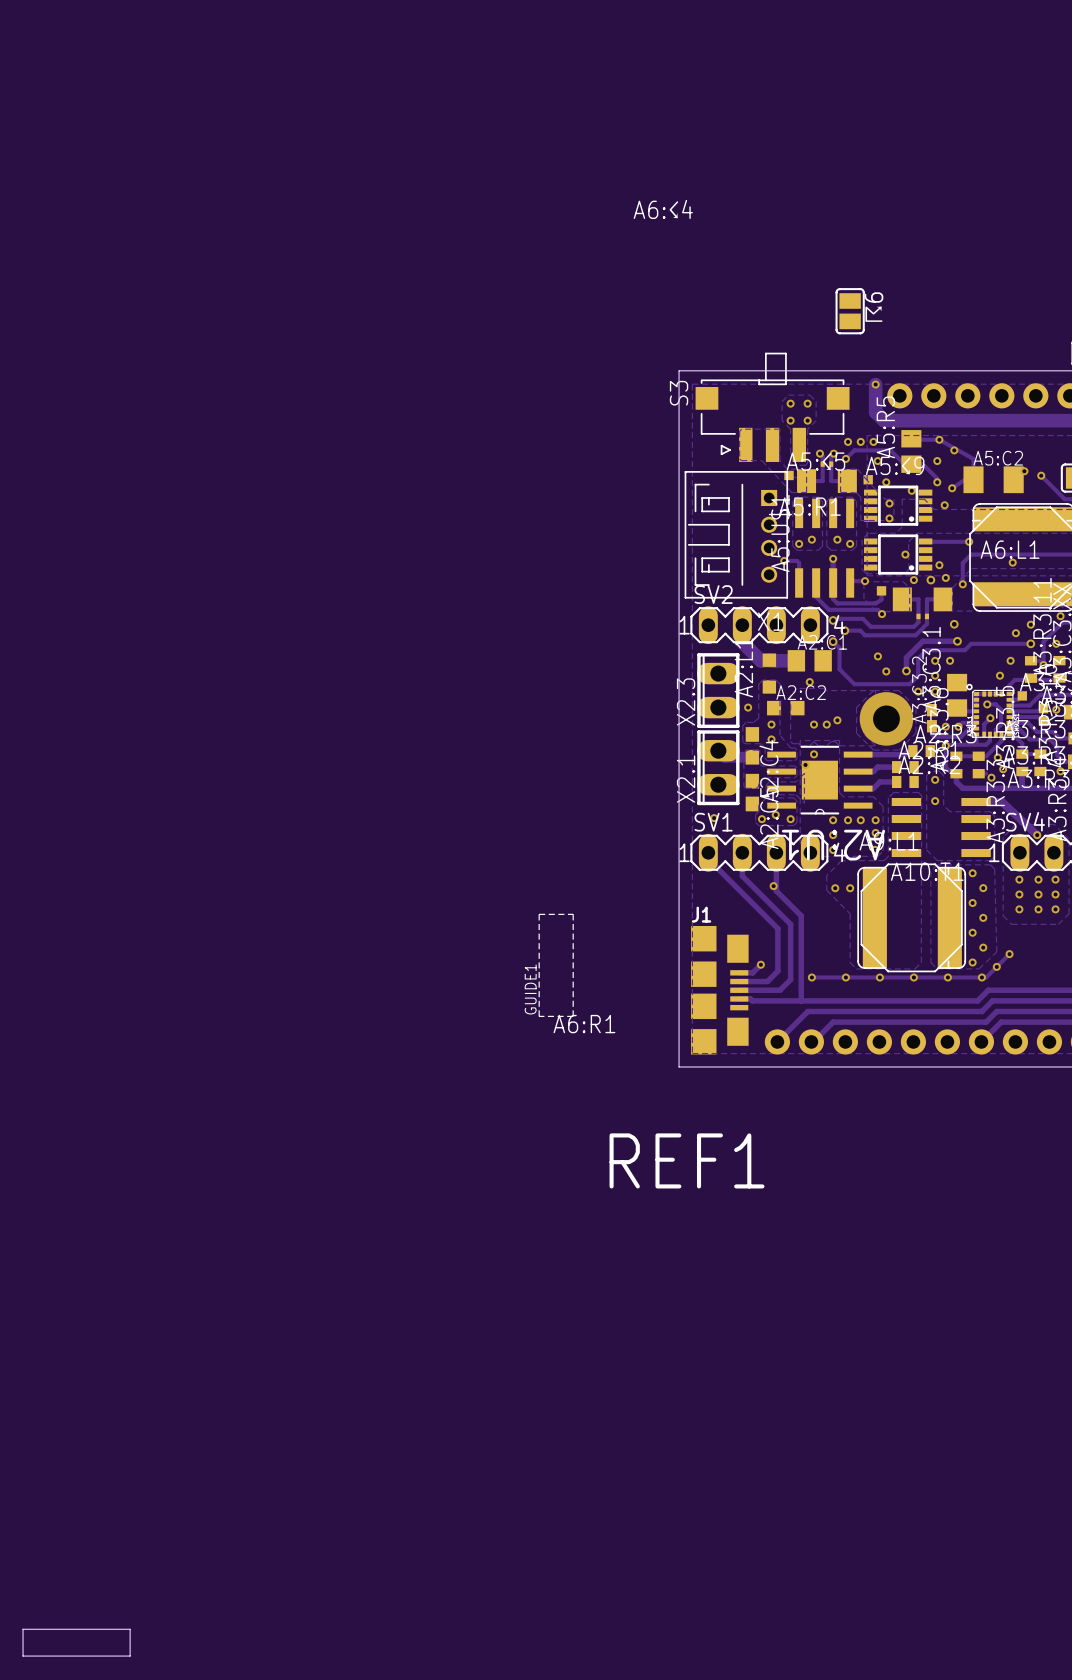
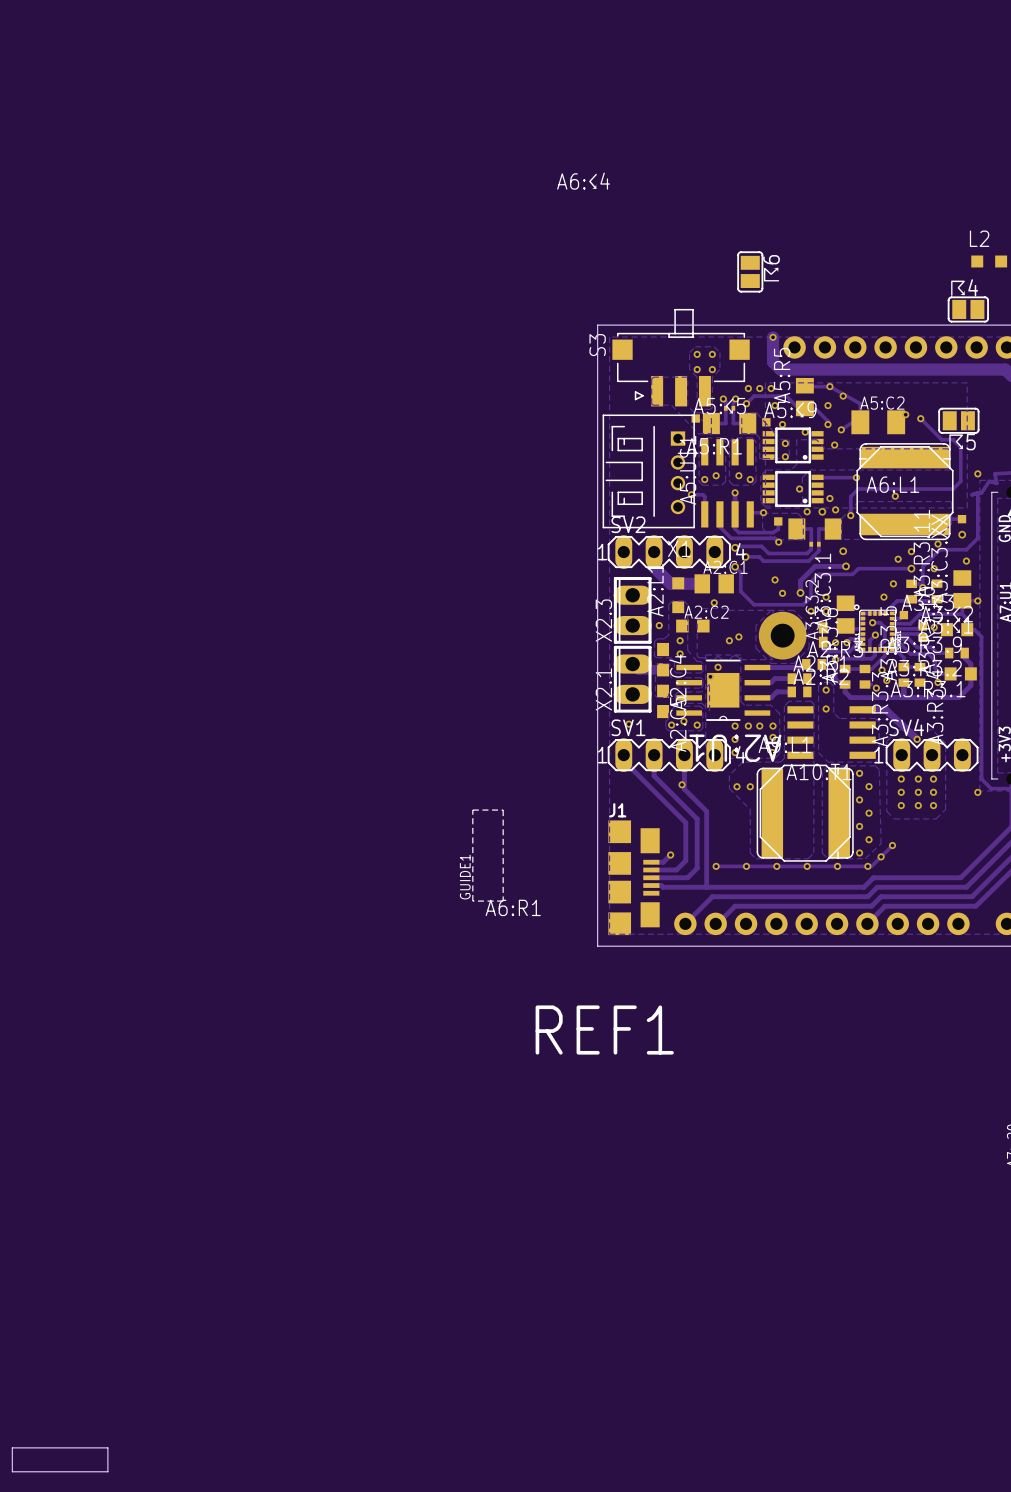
via: (935, 660) -> none
via: (950, 660) -> none
via: (814, 724) -> none

